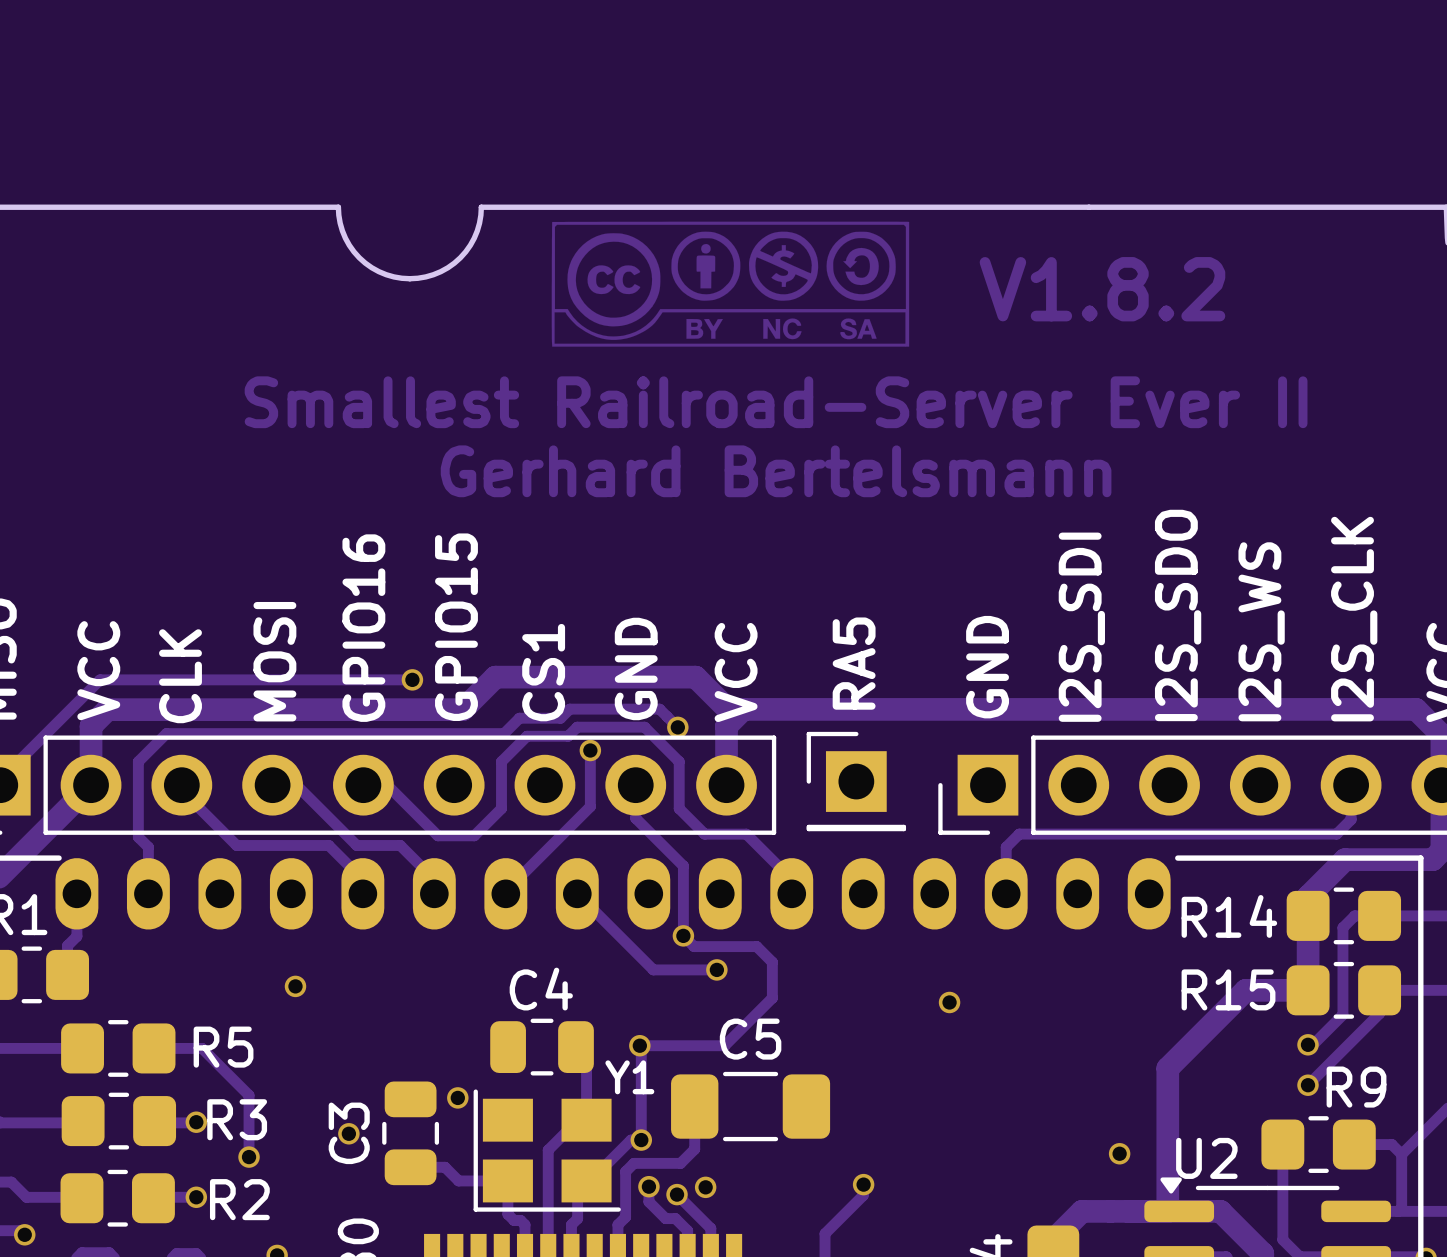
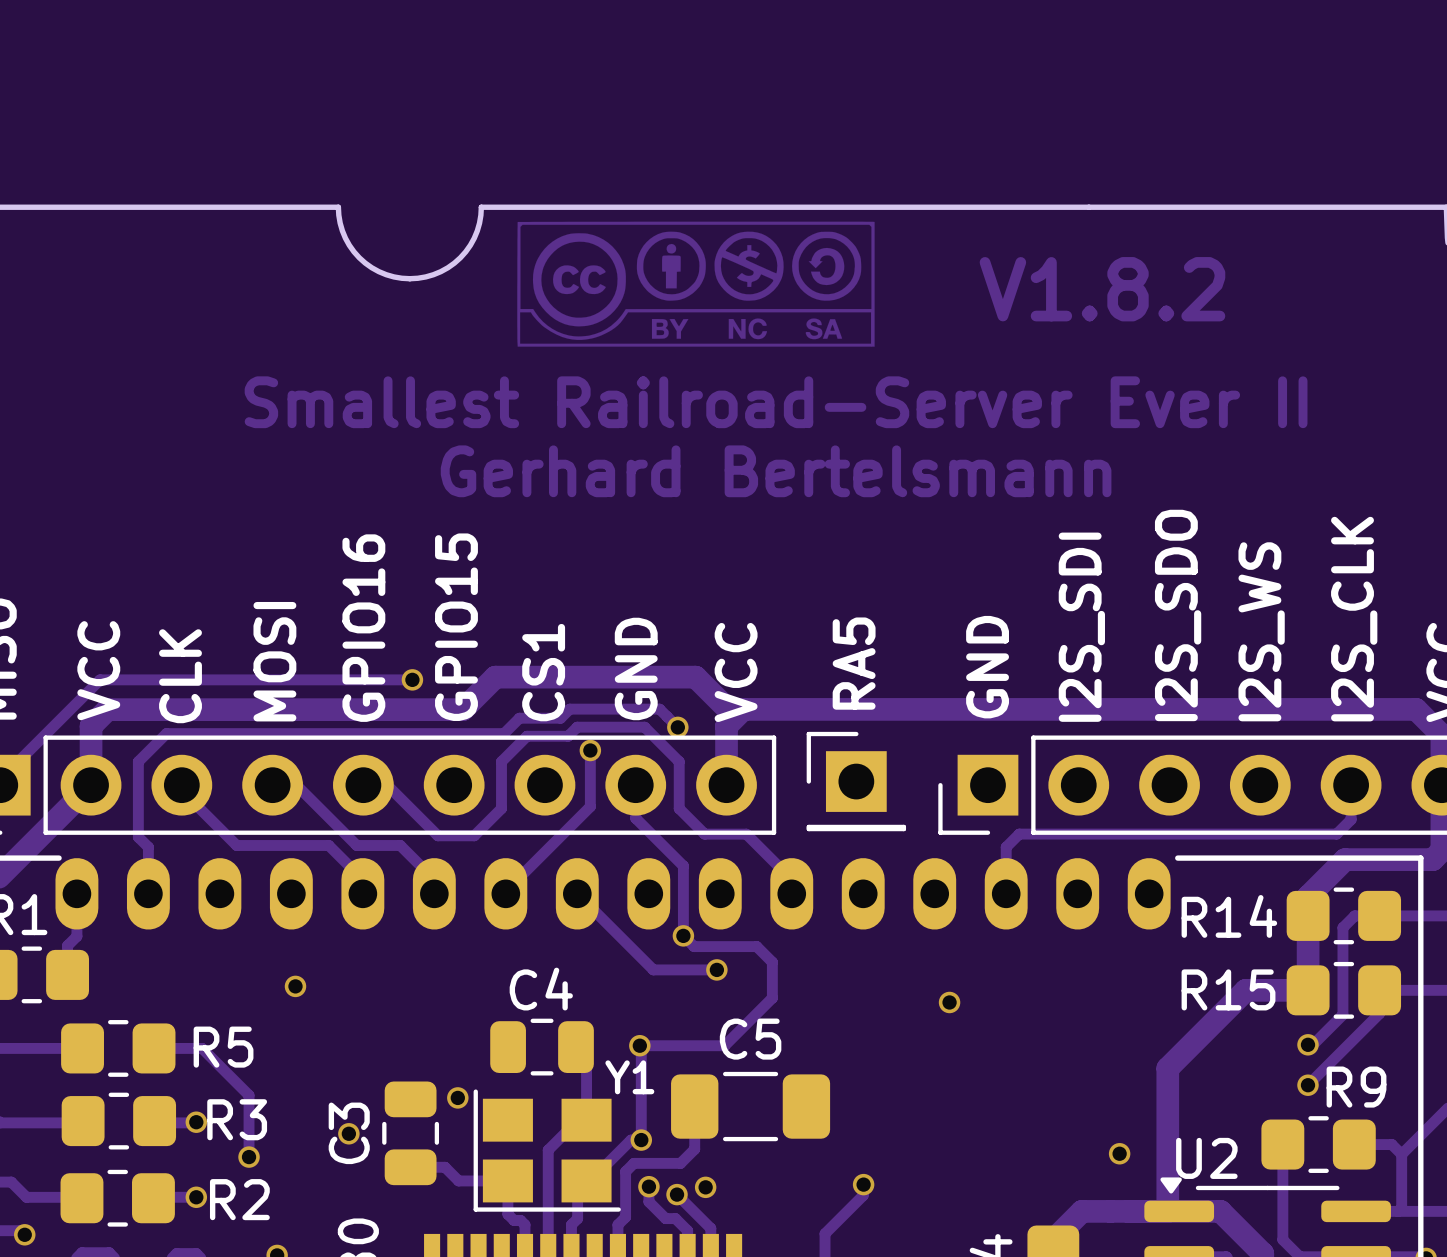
drawing position: (730, 284) -> (695, 284)

